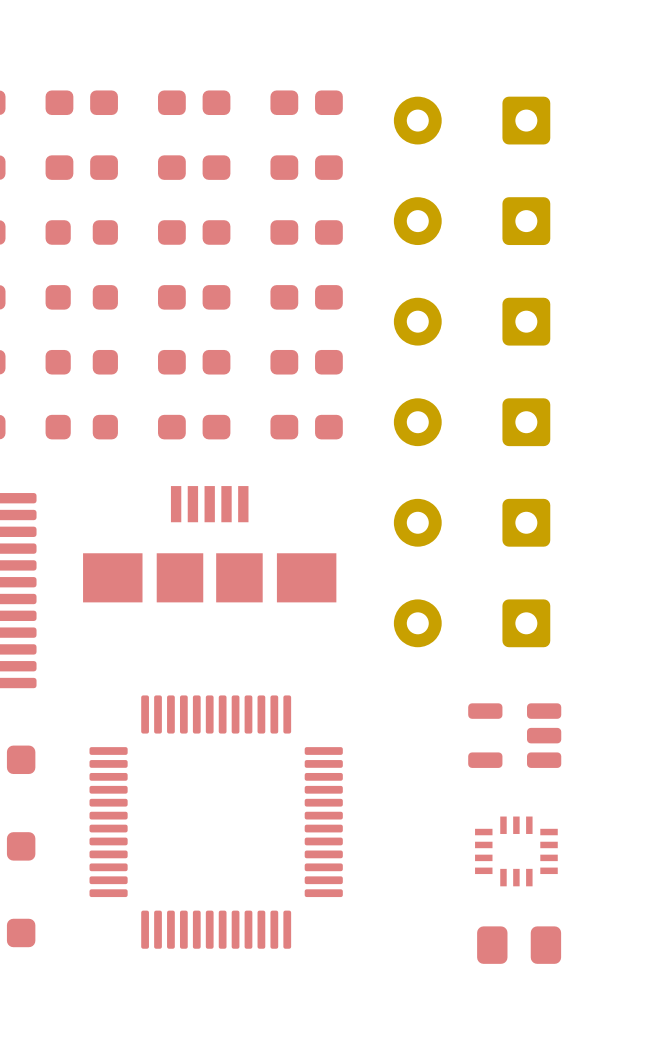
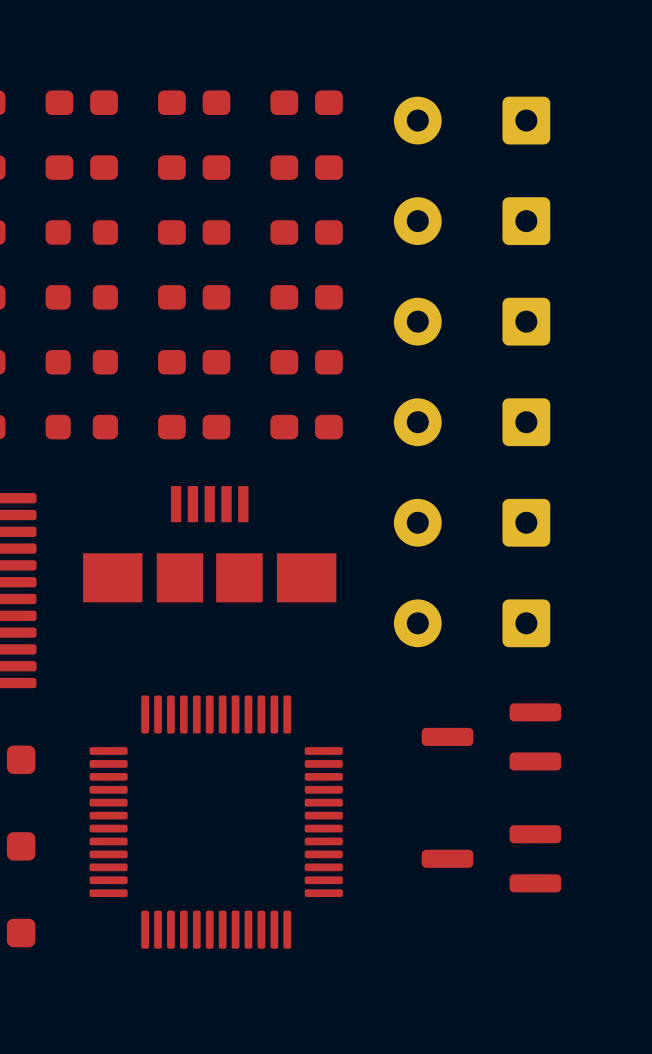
part footprint: [468, 703, 562, 768] -> [421, 703, 562, 771]
part: (516, 851) -> none
part: none -> (491, 858)
part: (519, 945) -> none

